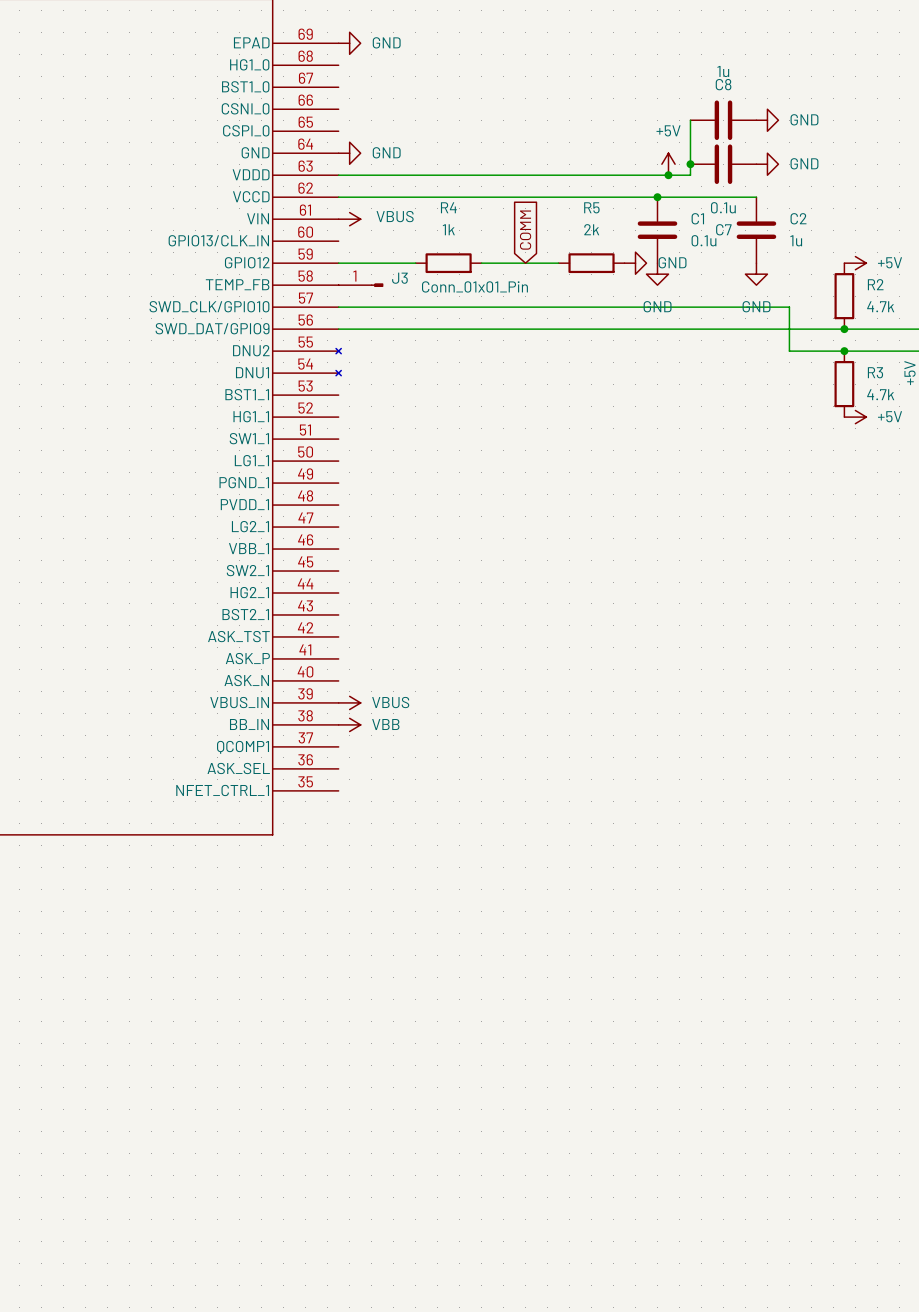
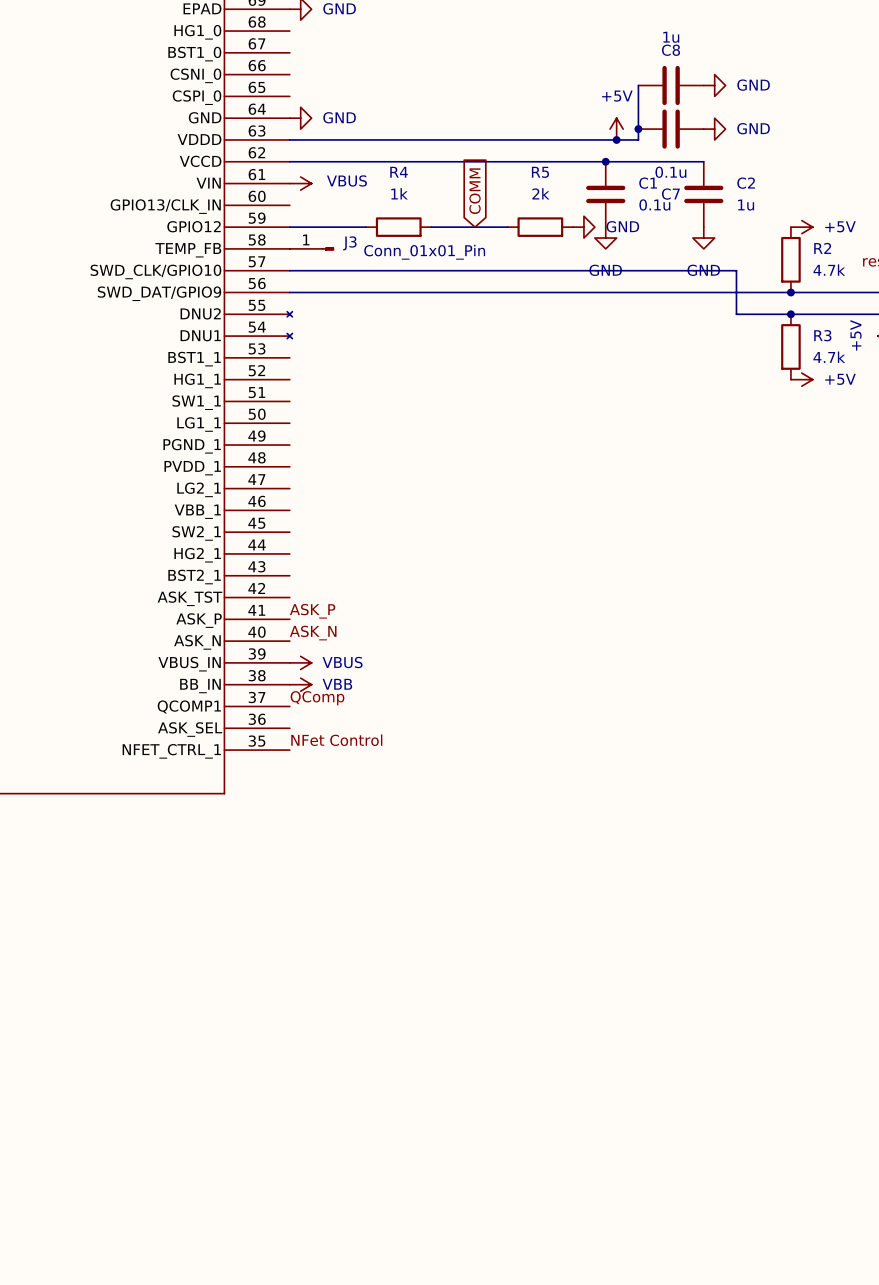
label: none -> ASK_P (312, 611)
label: none -> ASK_N (313, 633)
label: none -> QComp (317, 698)
label: none -> NFet Control (336, 740)

